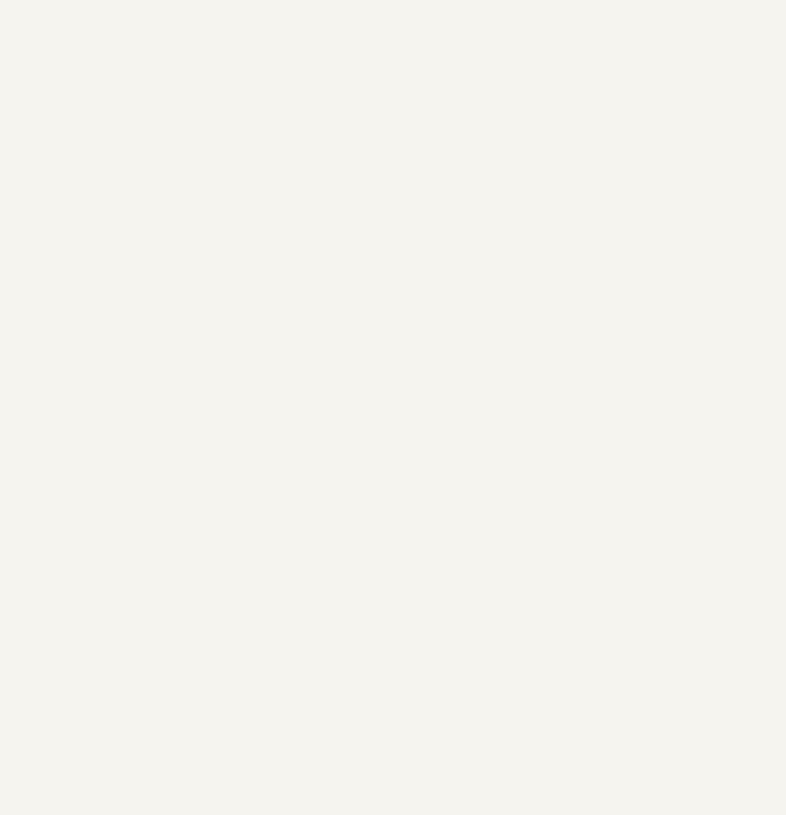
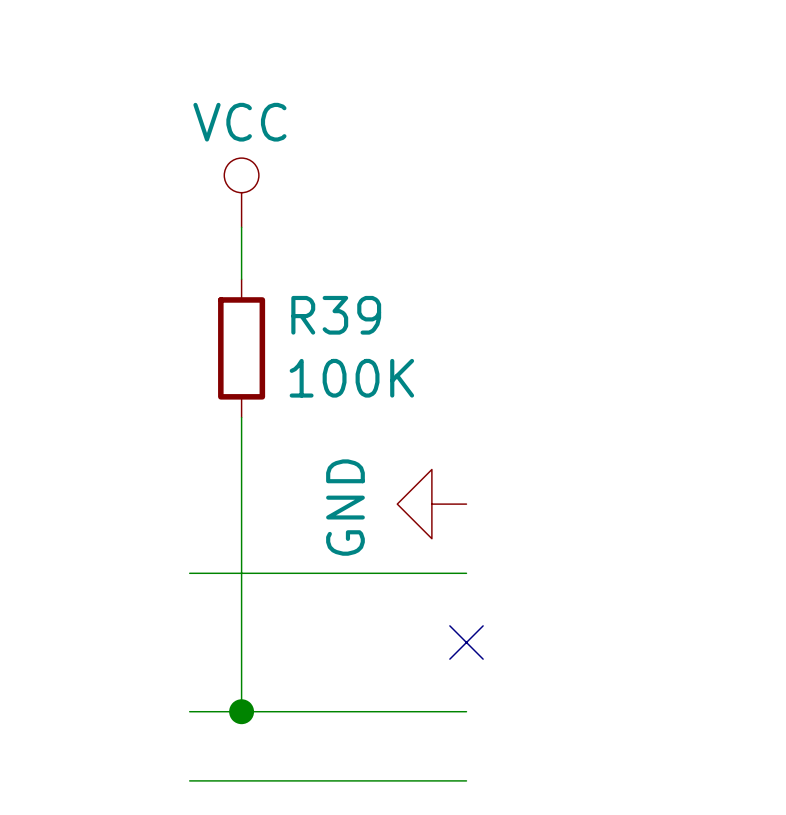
power symbol: none -> VCC (241, 192)
wire: none -> (241, 227) (241, 279)
R39: none -> 100K (241, 348)
wire: none -> (241, 417) (241, 711)
power symbol: none -> GND (431, 504)
wire: none -> (189, 573) (466, 573)
no-connect mark: none -> (466, 642)
wire: none -> (189, 711) (466, 711)
junction: none -> (241, 711)
wire: none -> (189, 780) (466, 780)

